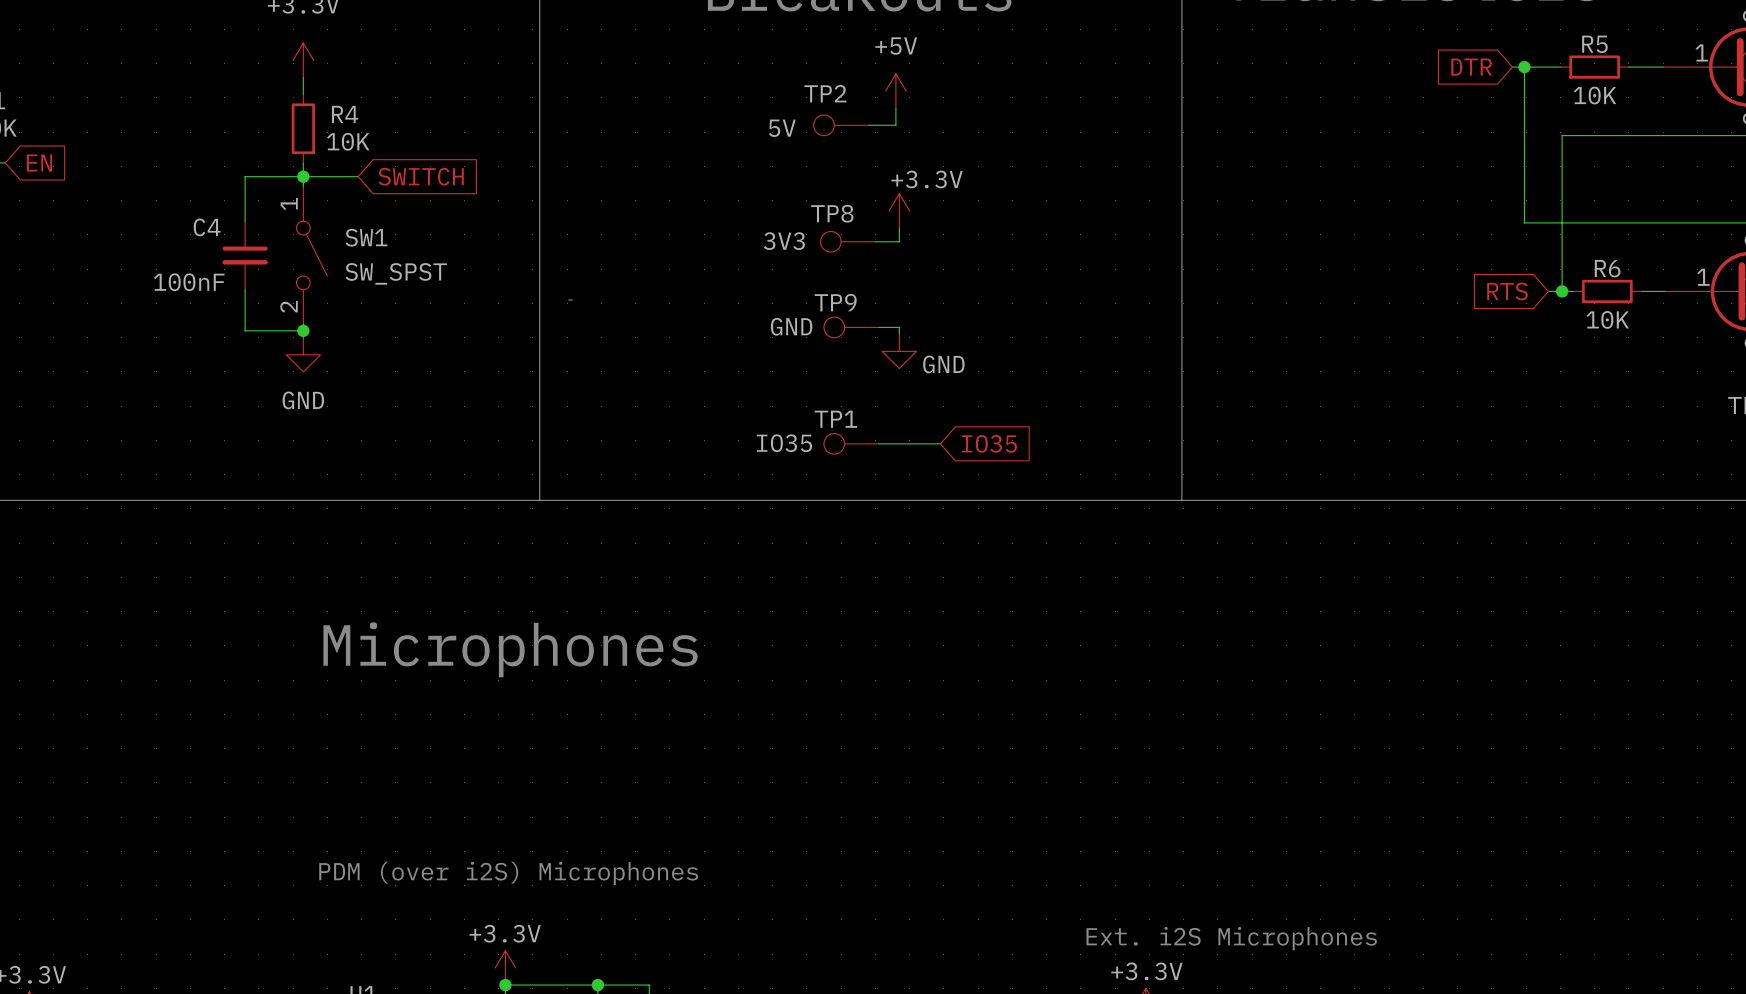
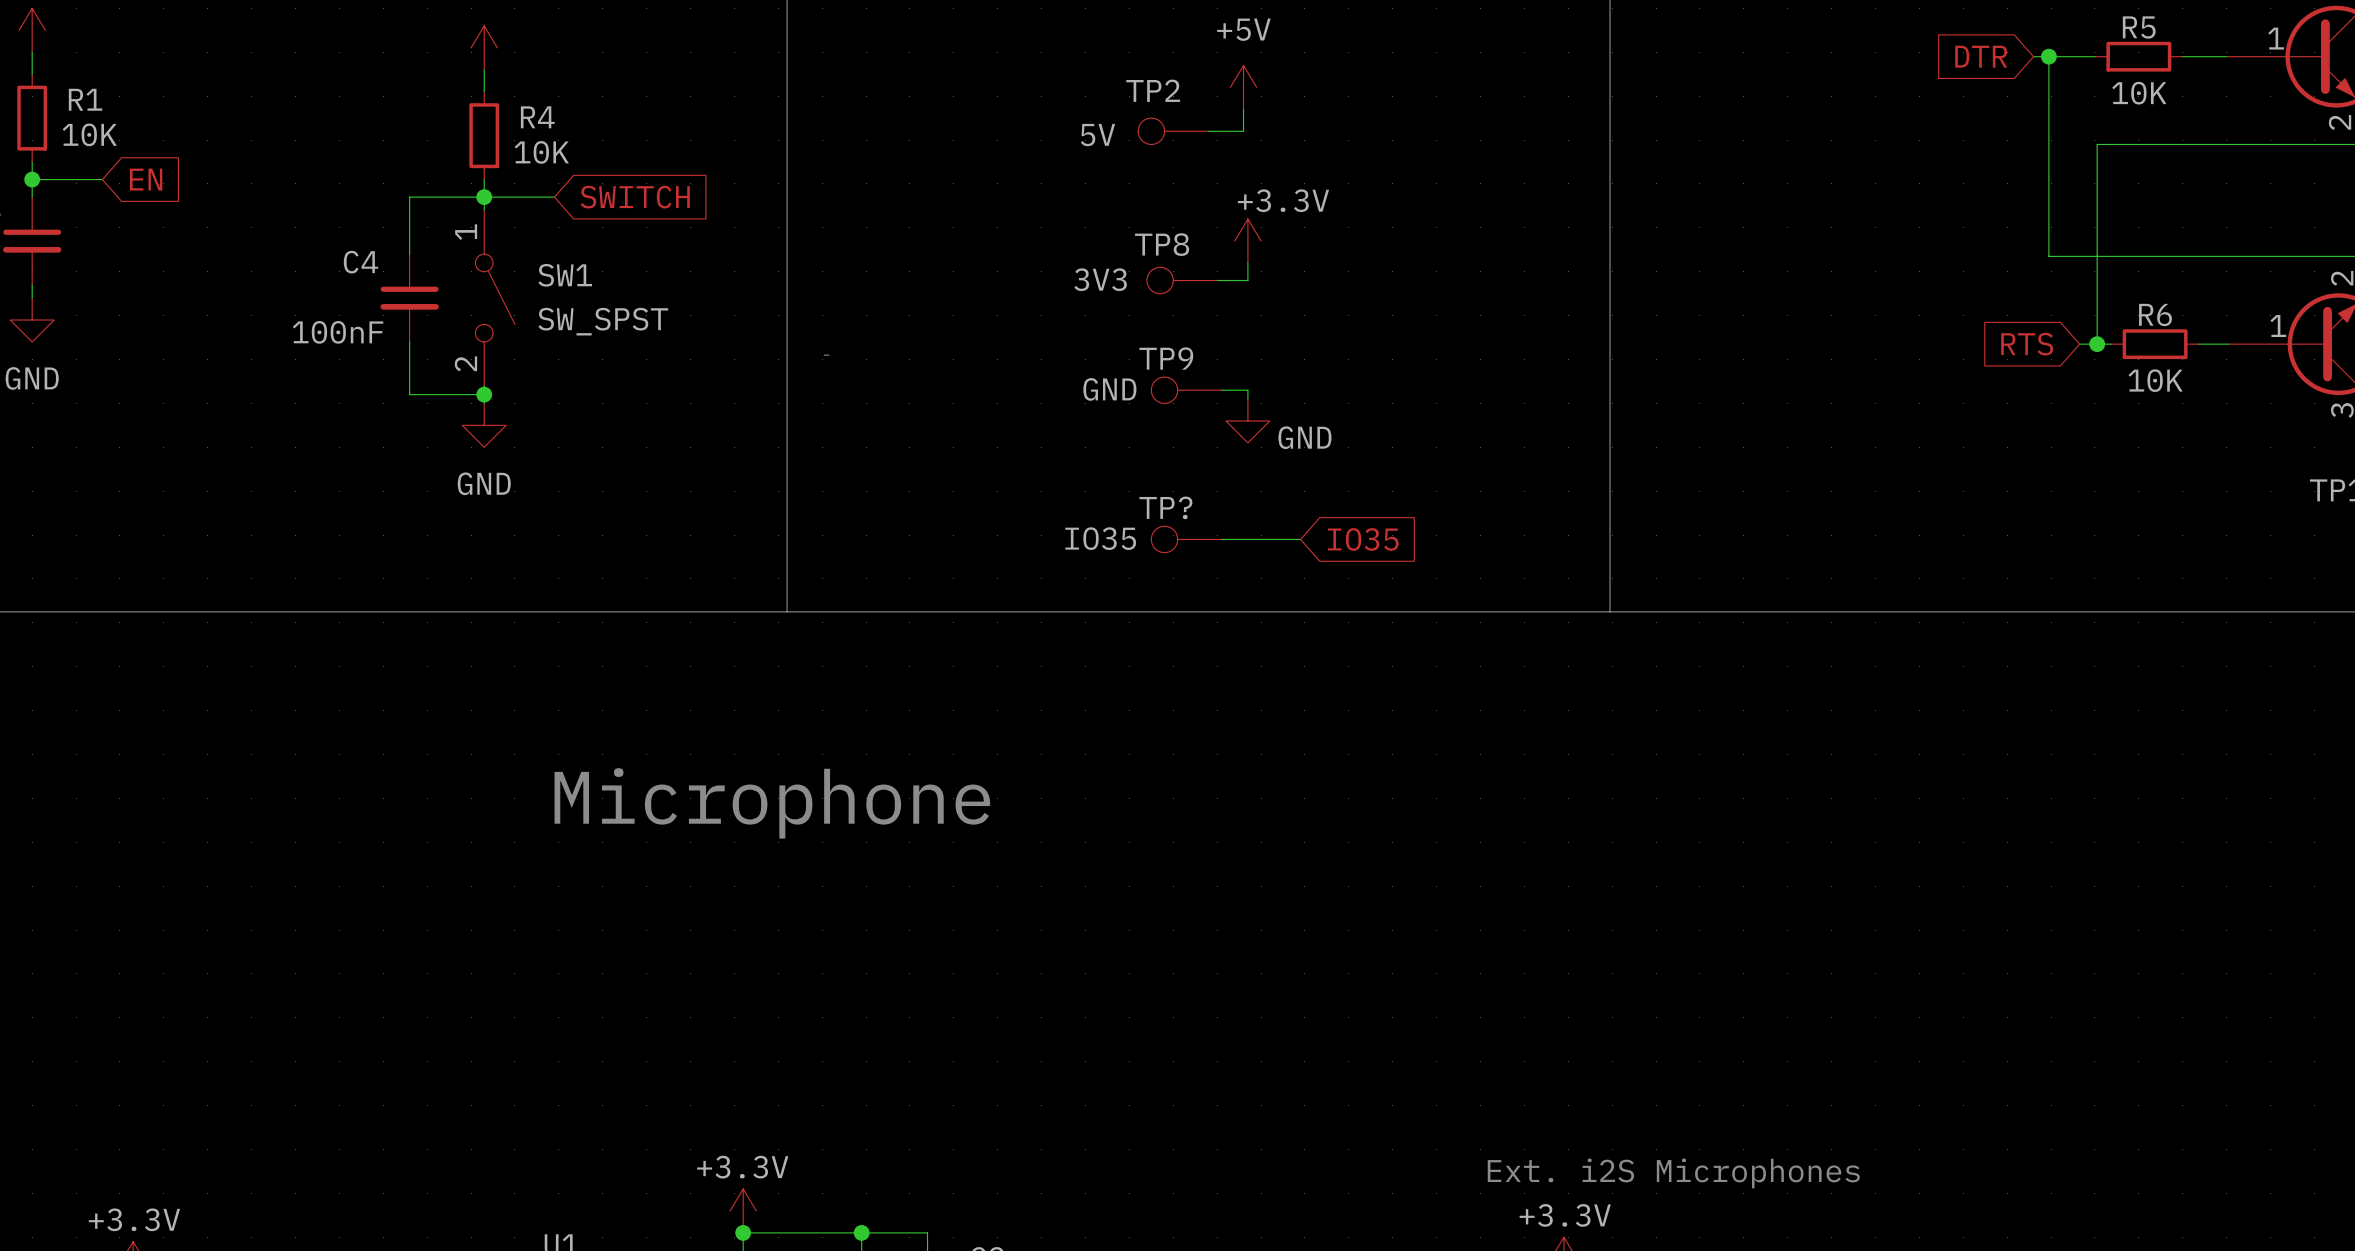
TP1 name: TP1 (835, 419) -> TP? (1165, 507)
text: Microphones (510, 649) -> Microphone (772, 803)
text: PDM (over i2S) Microphones (508, 873) -> none

